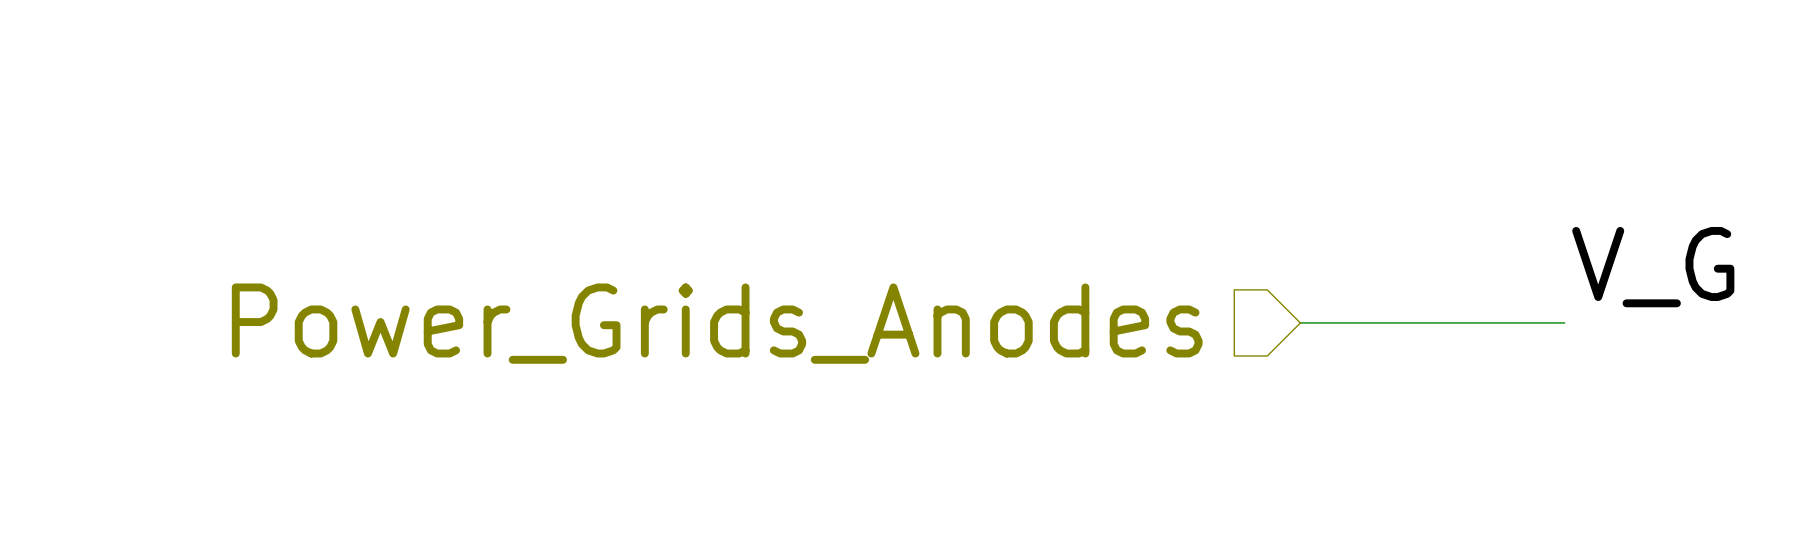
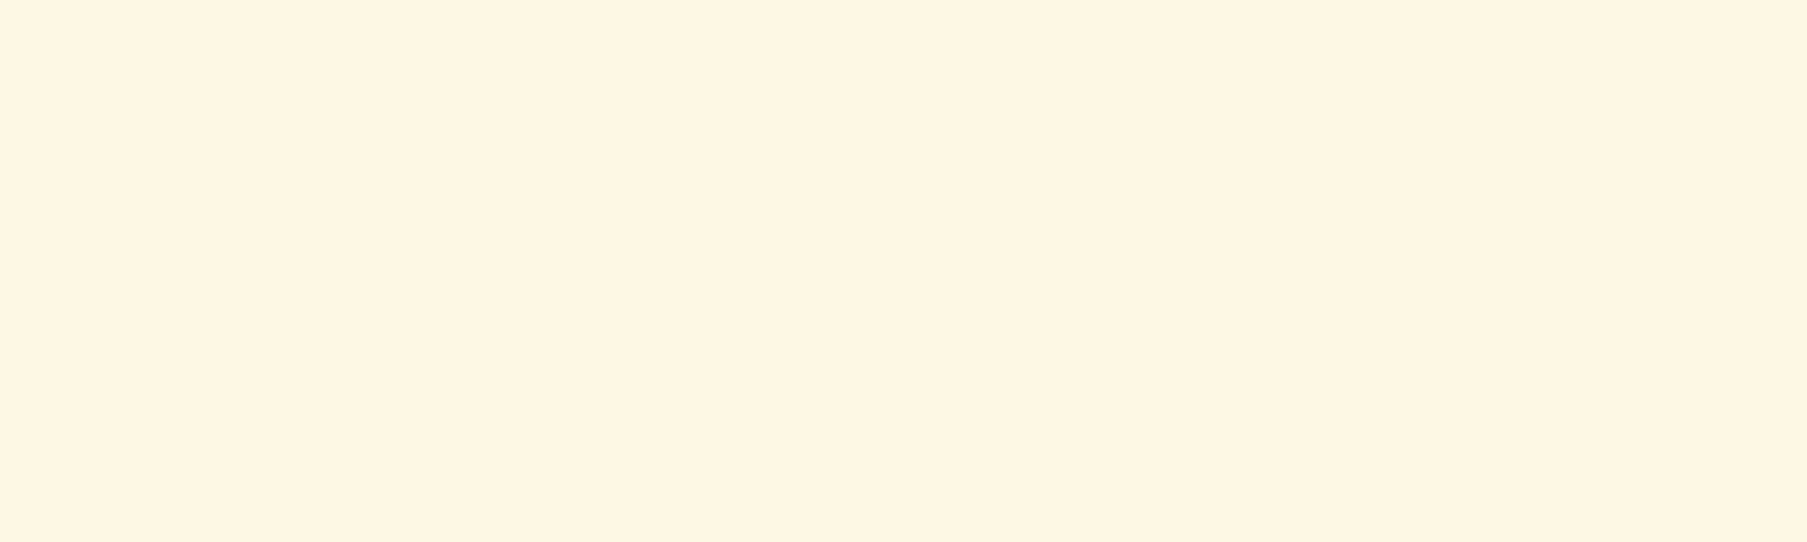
label: V_G (1653, 267) -> none
wire: (1300, 322) (1564, 322) -> none
hierarchical label: Power_Grids_Anodes (717, 323) -> none

